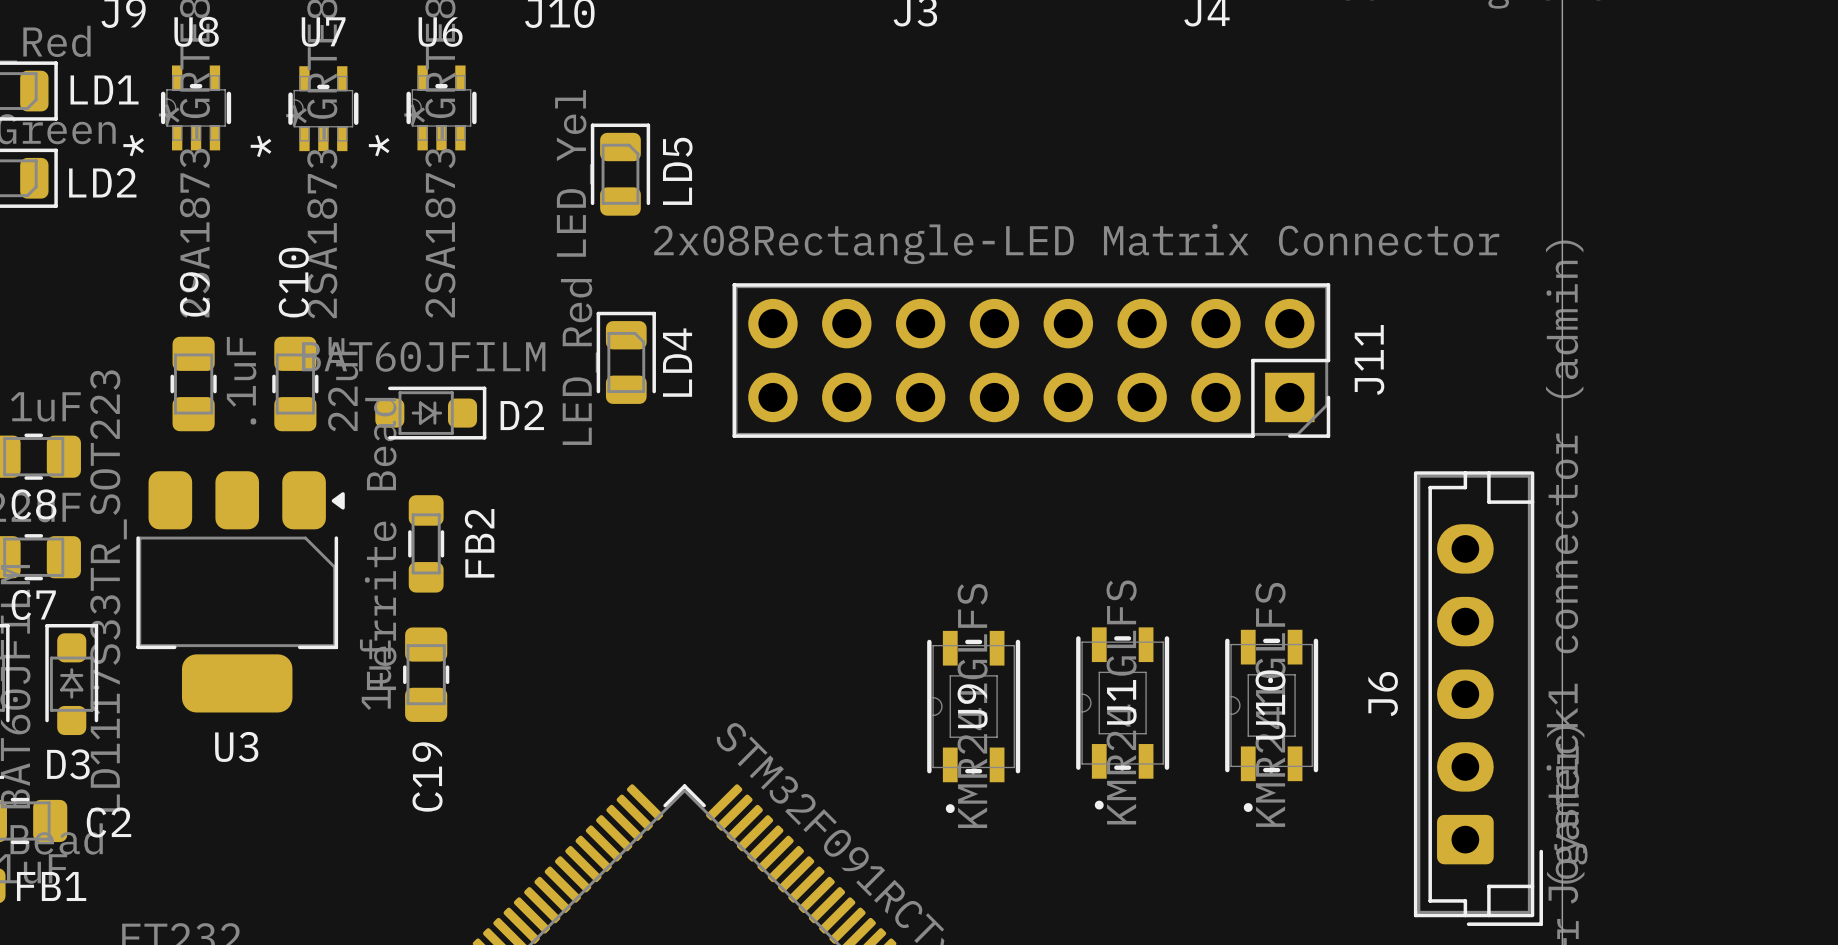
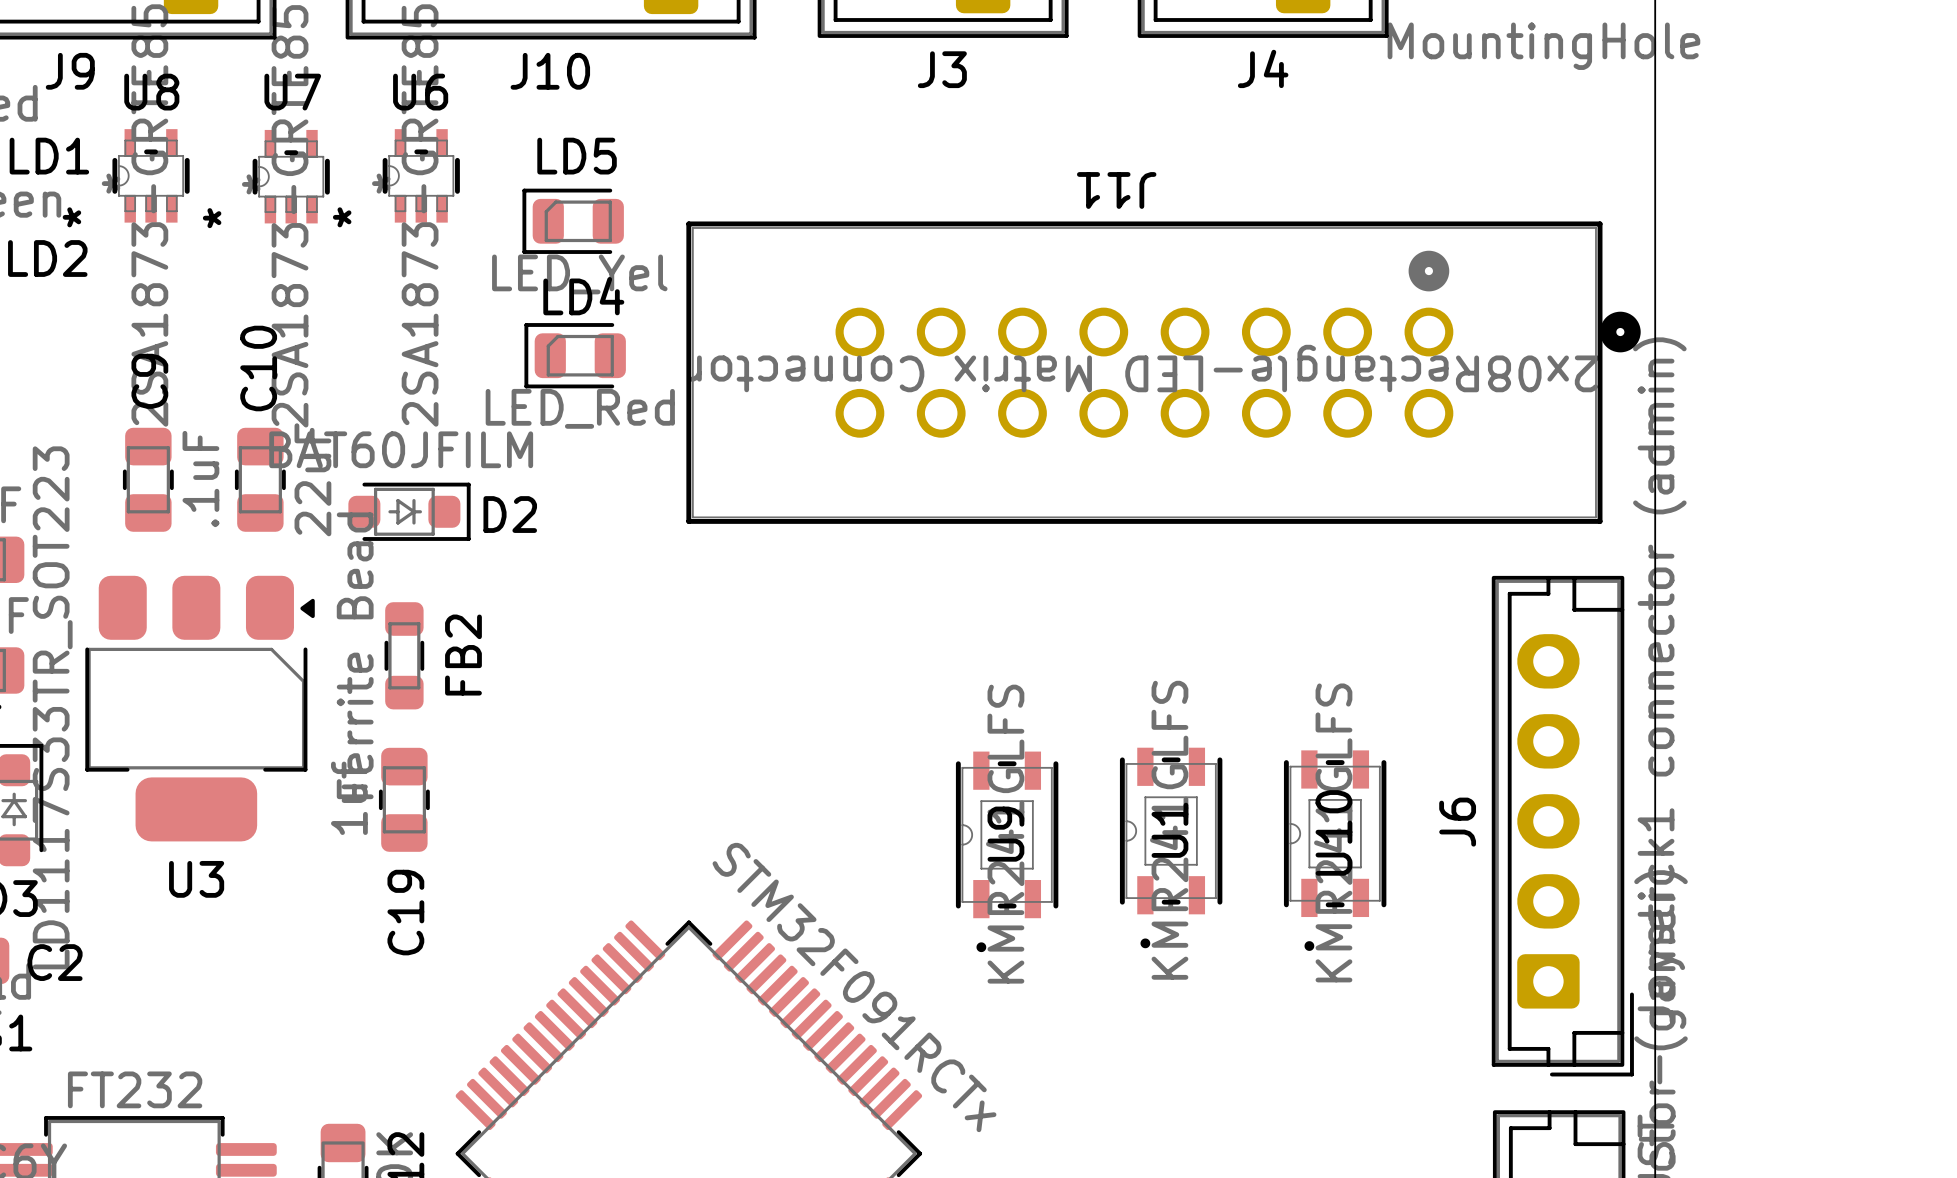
LD5 rotation: 0° (620, 169) -> 90° counterclockwise (573, 221)
J11 value position: 2x08Rectangle-LED Matrix Connector (1076, 244) -> 2x08Rectangle-LED Matrix Connector (1143, 368)
J11 footprint: [732, 283, 1331, 438] -> [686, 221, 1641, 524]
LD4 rotation: 0° (626, 357) -> 90° counterclockwise (575, 355)
LD4 position: (626, 357) -> (575, 355)
J11 name position: J11 (1369, 359) -> J11 (1116, 190)

